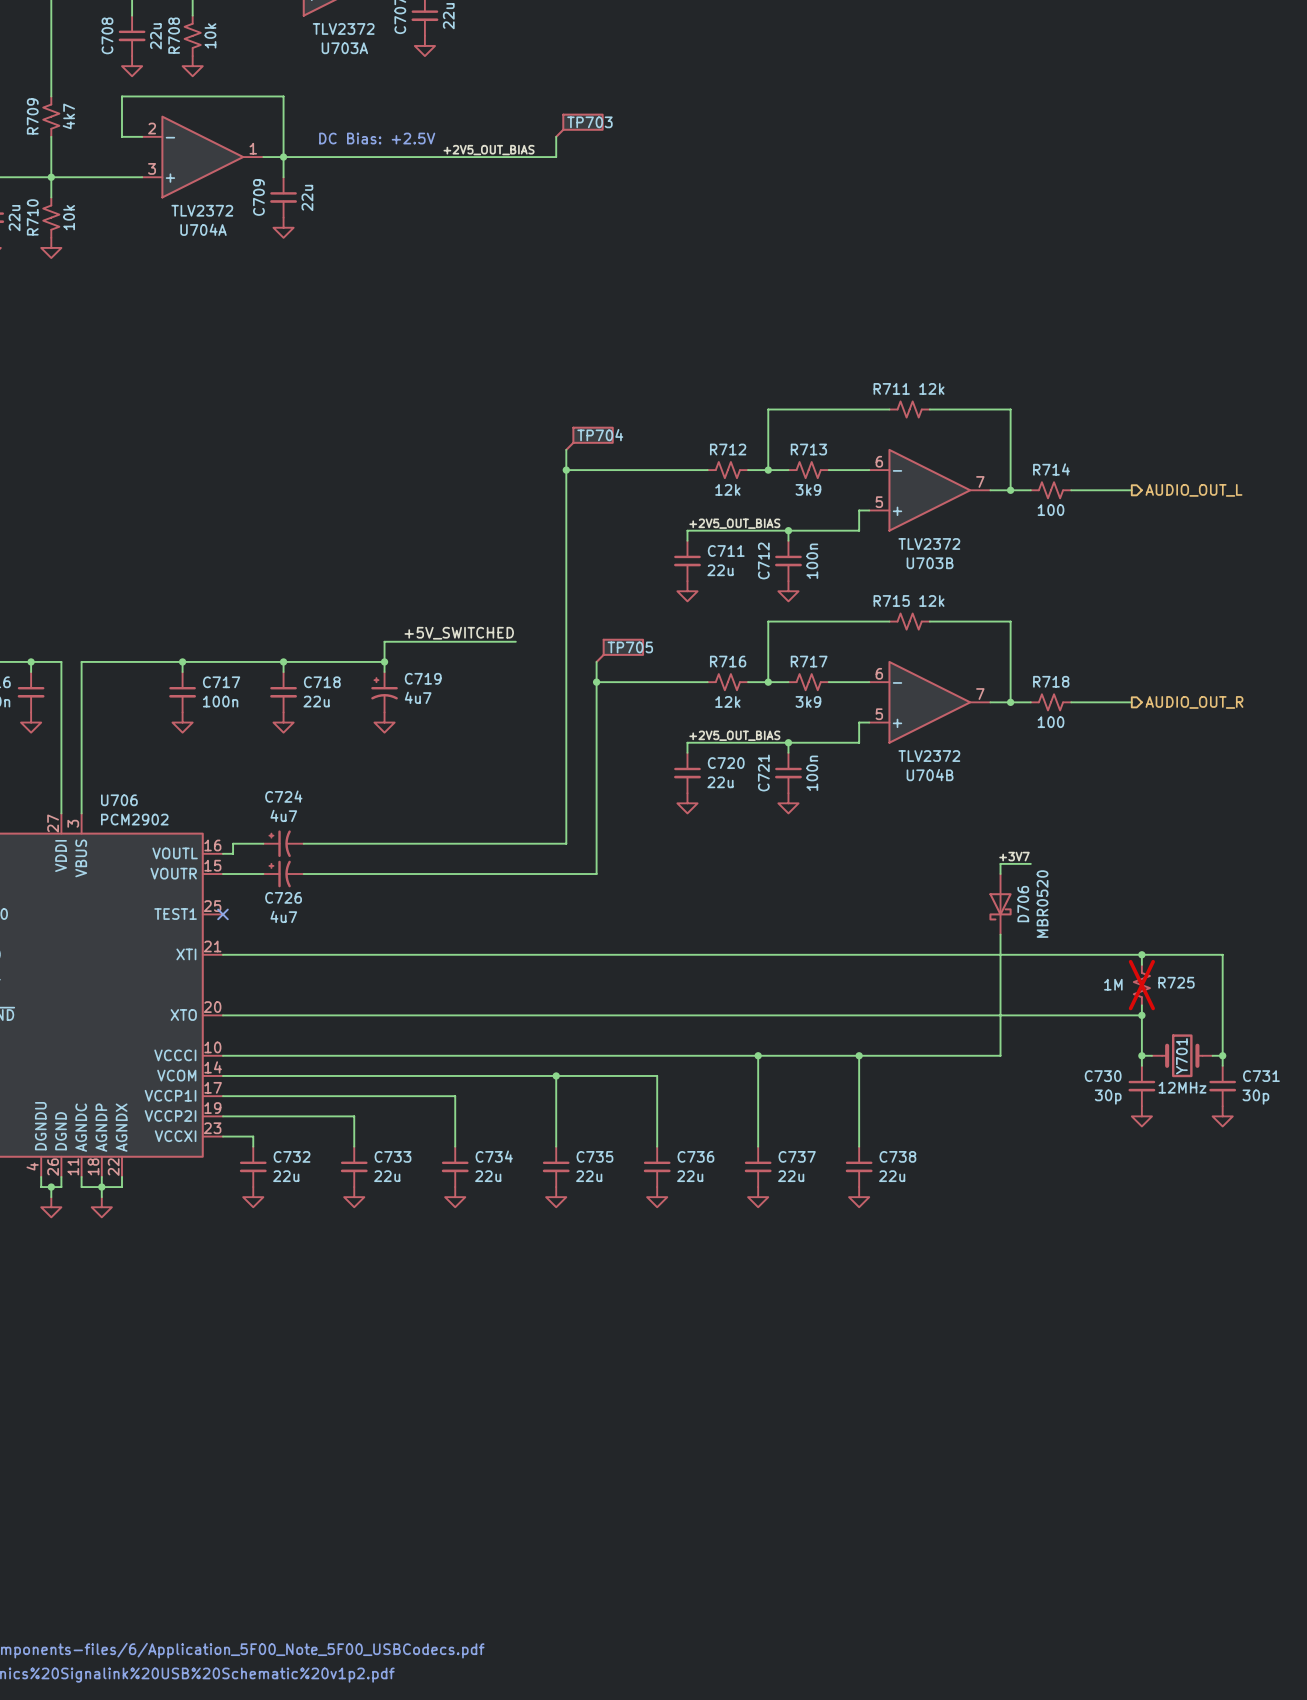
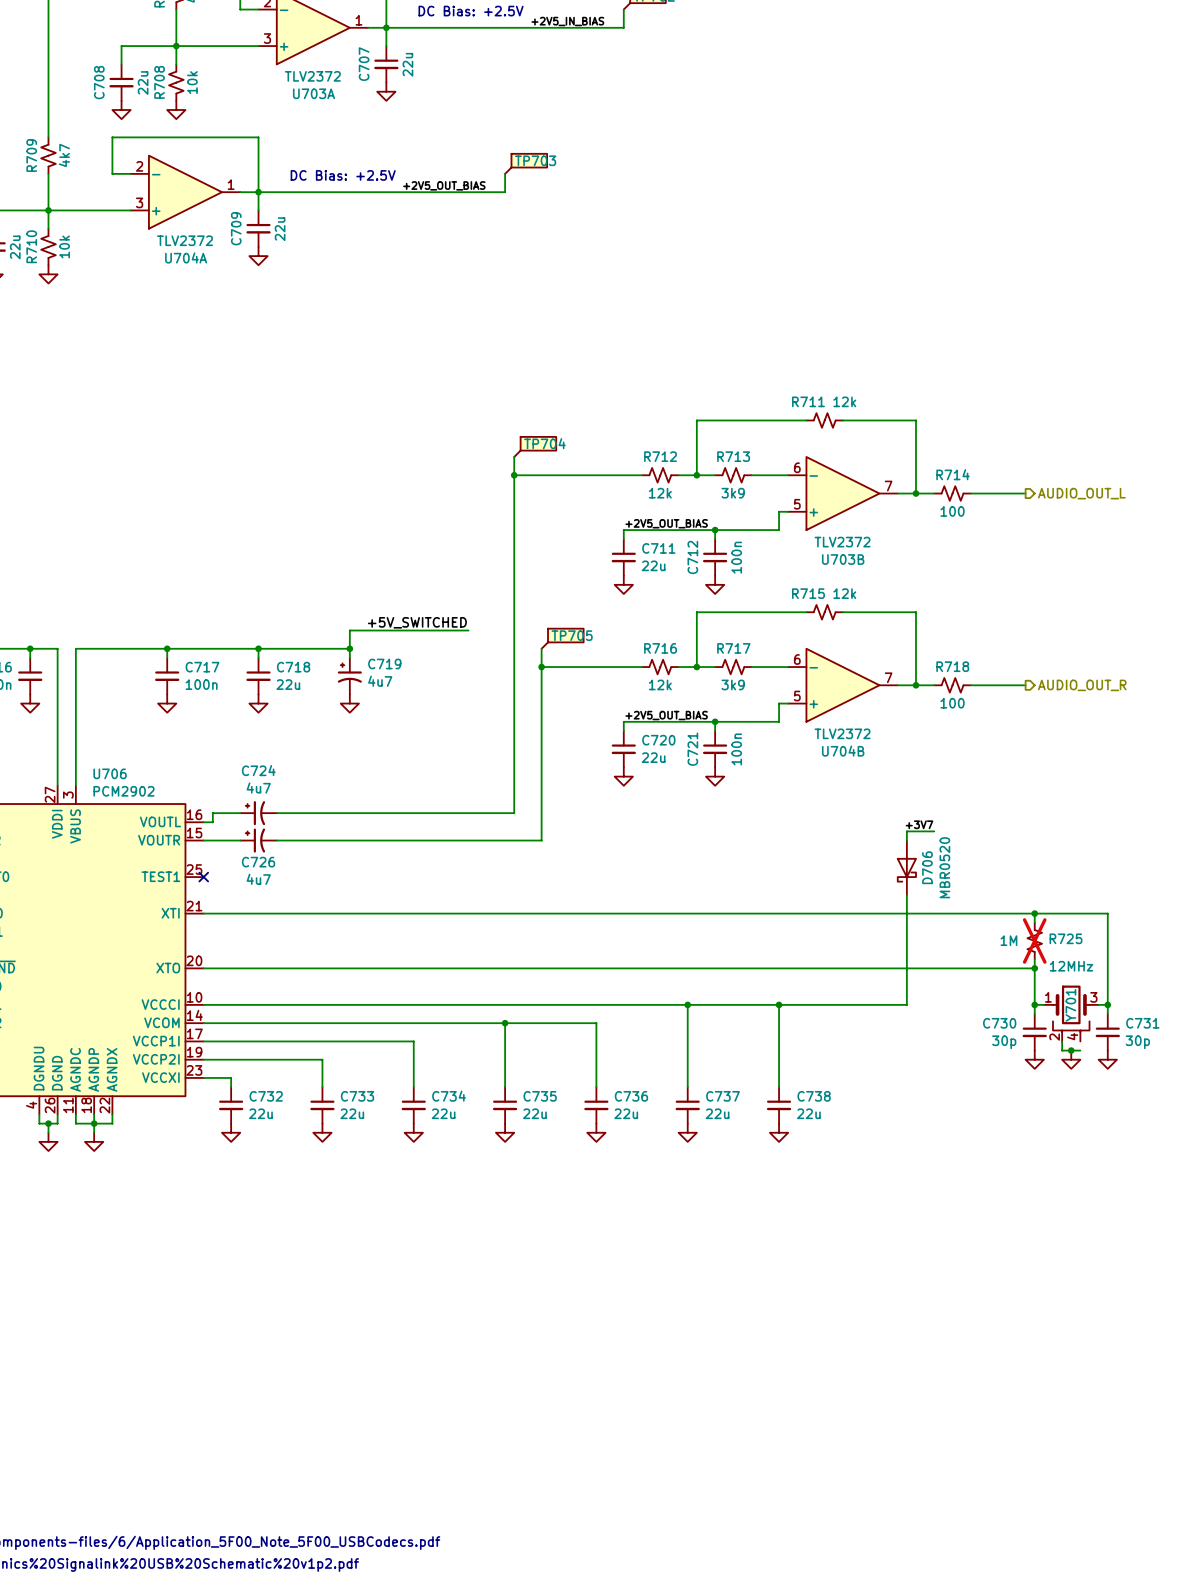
Y701 symbol: [1151, 1034, 1213, 1078] -> [1043, 985, 1099, 1042]
Y701 value position: 12MHz (1182, 1087) -> 12MHz (1071, 966)
wire: none -> (1062, 1041) (1062, 1050) (1080, 1050)
junction: none -> (1071, 1050)
power symbol: none -> (1071, 1059)

